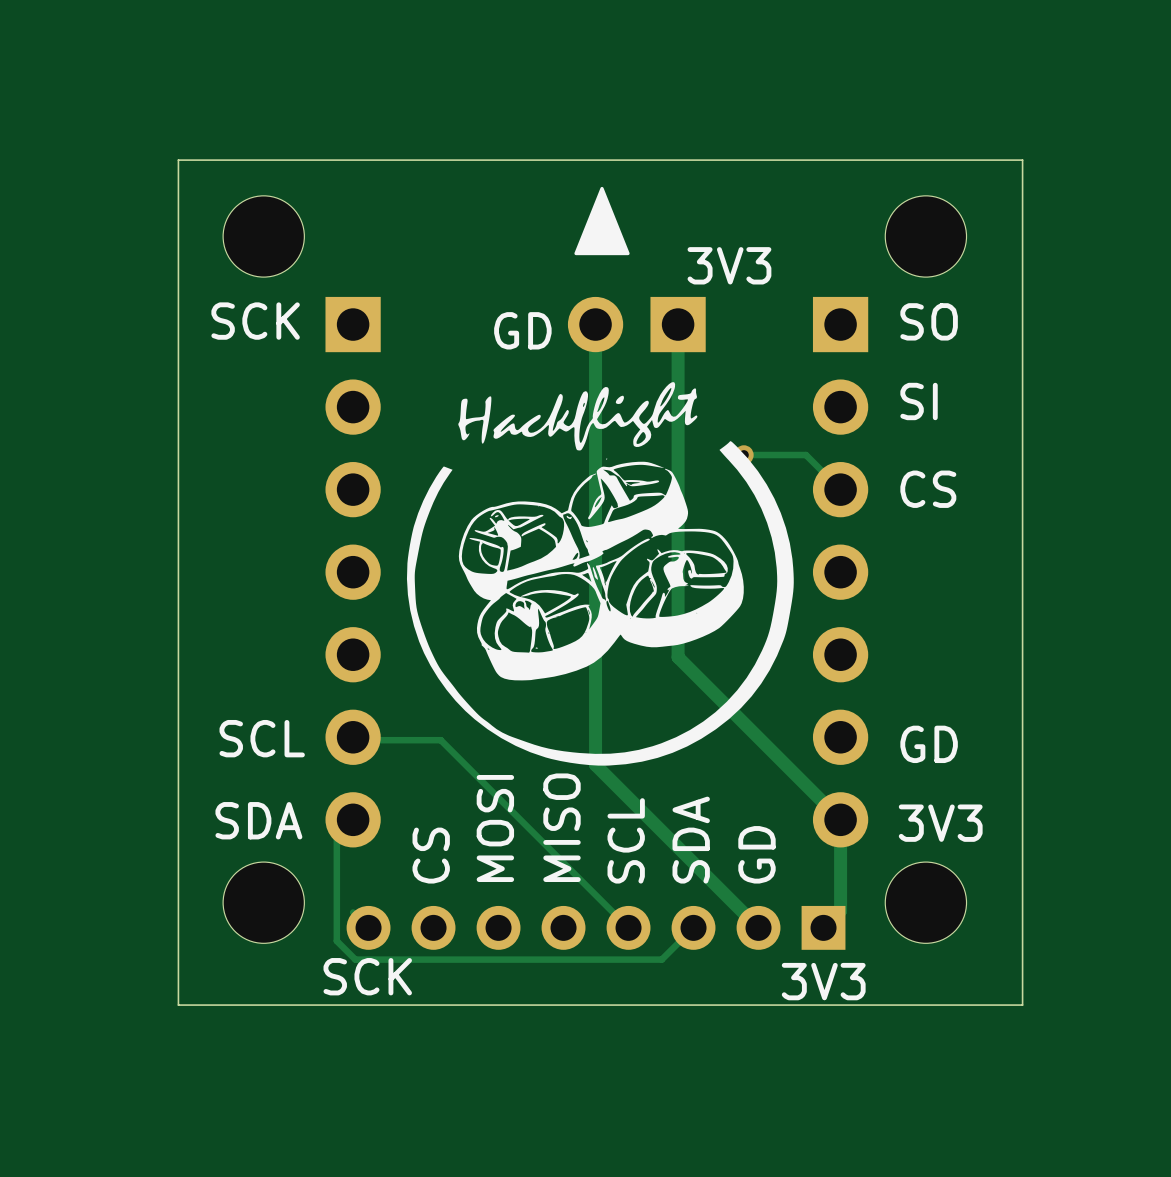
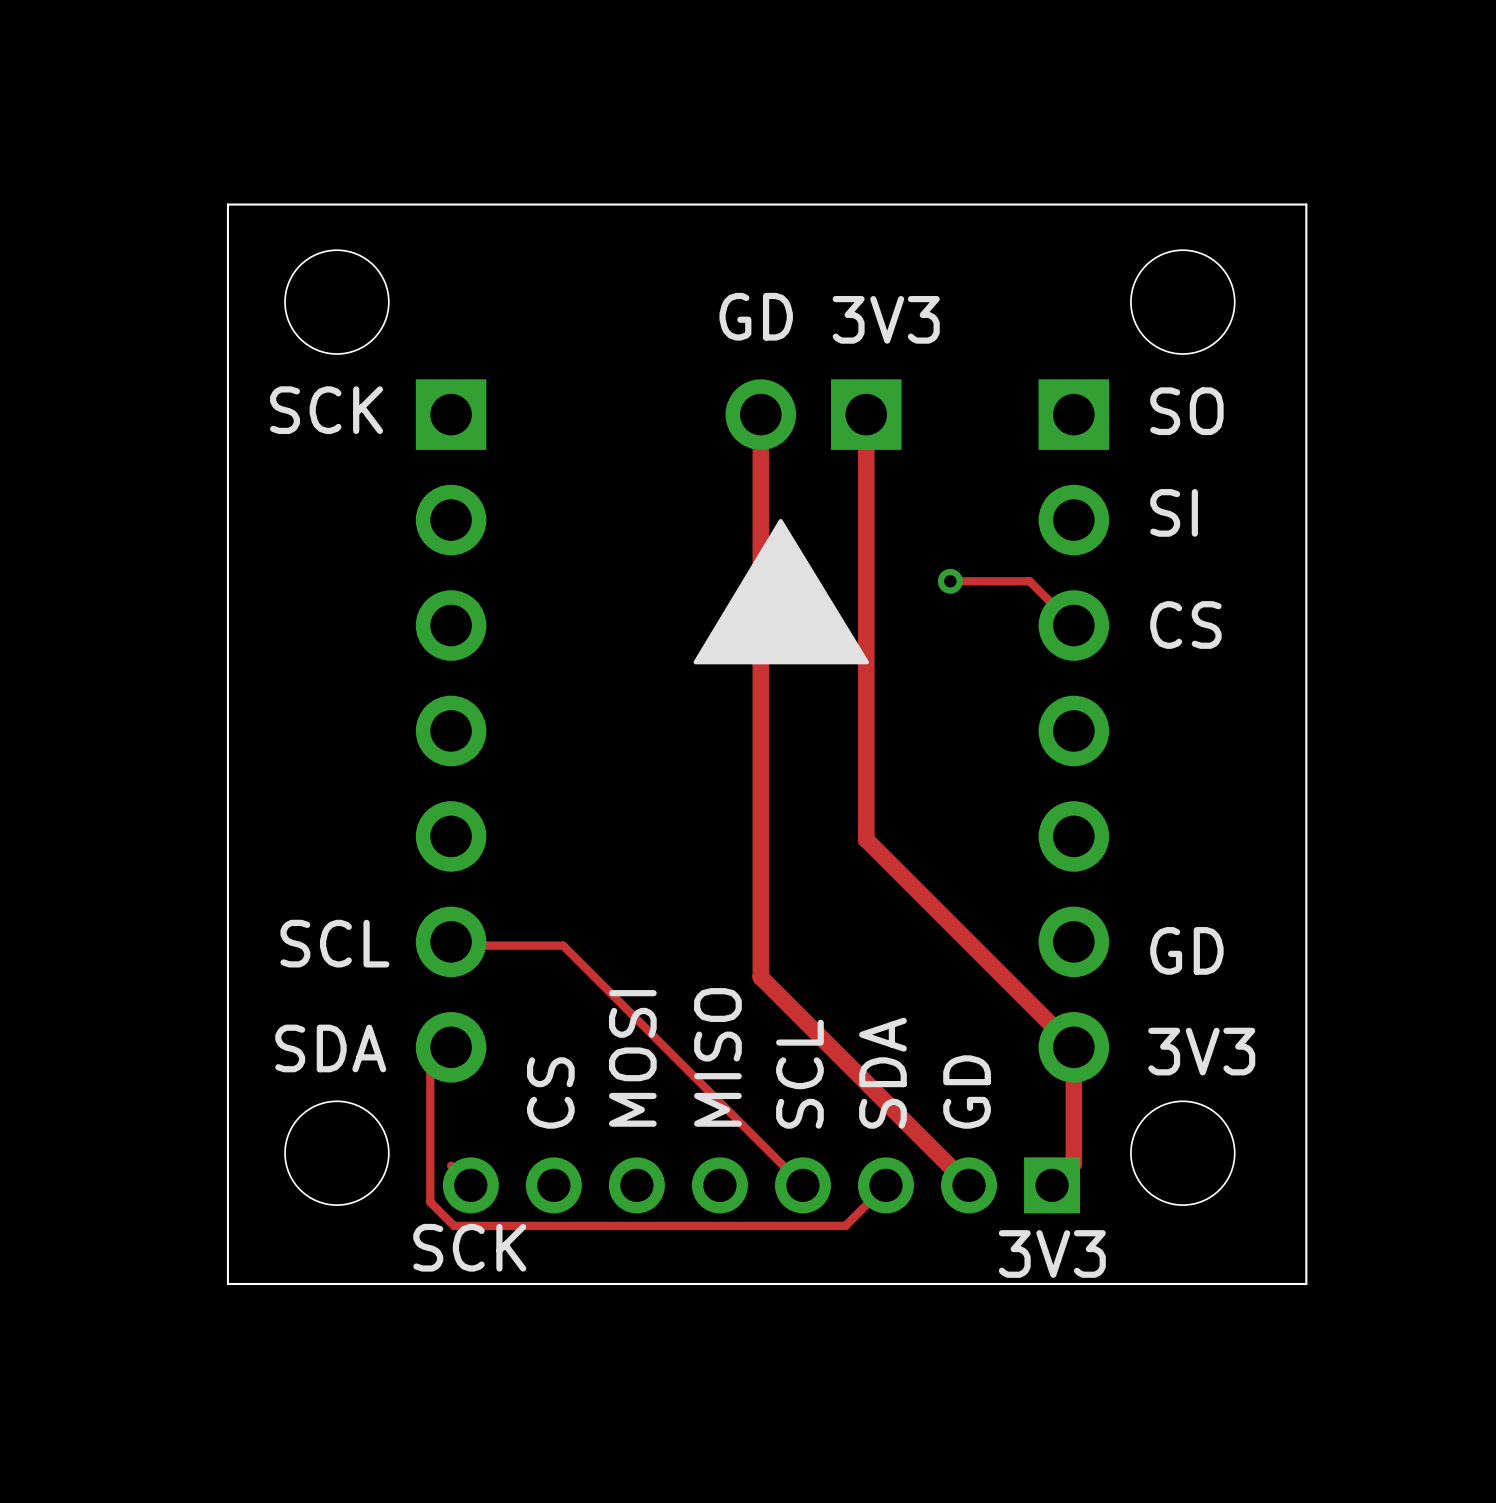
drawing: [574, 186, 630, 256] -> none
text position: 3V3 (729, 265) -> 3V3 (886, 319)
text position: GD (522, 330) -> GD (756, 316)
drawing: [406, 382, 794, 766] -> none
drawing: none -> [693, 519, 869, 665]

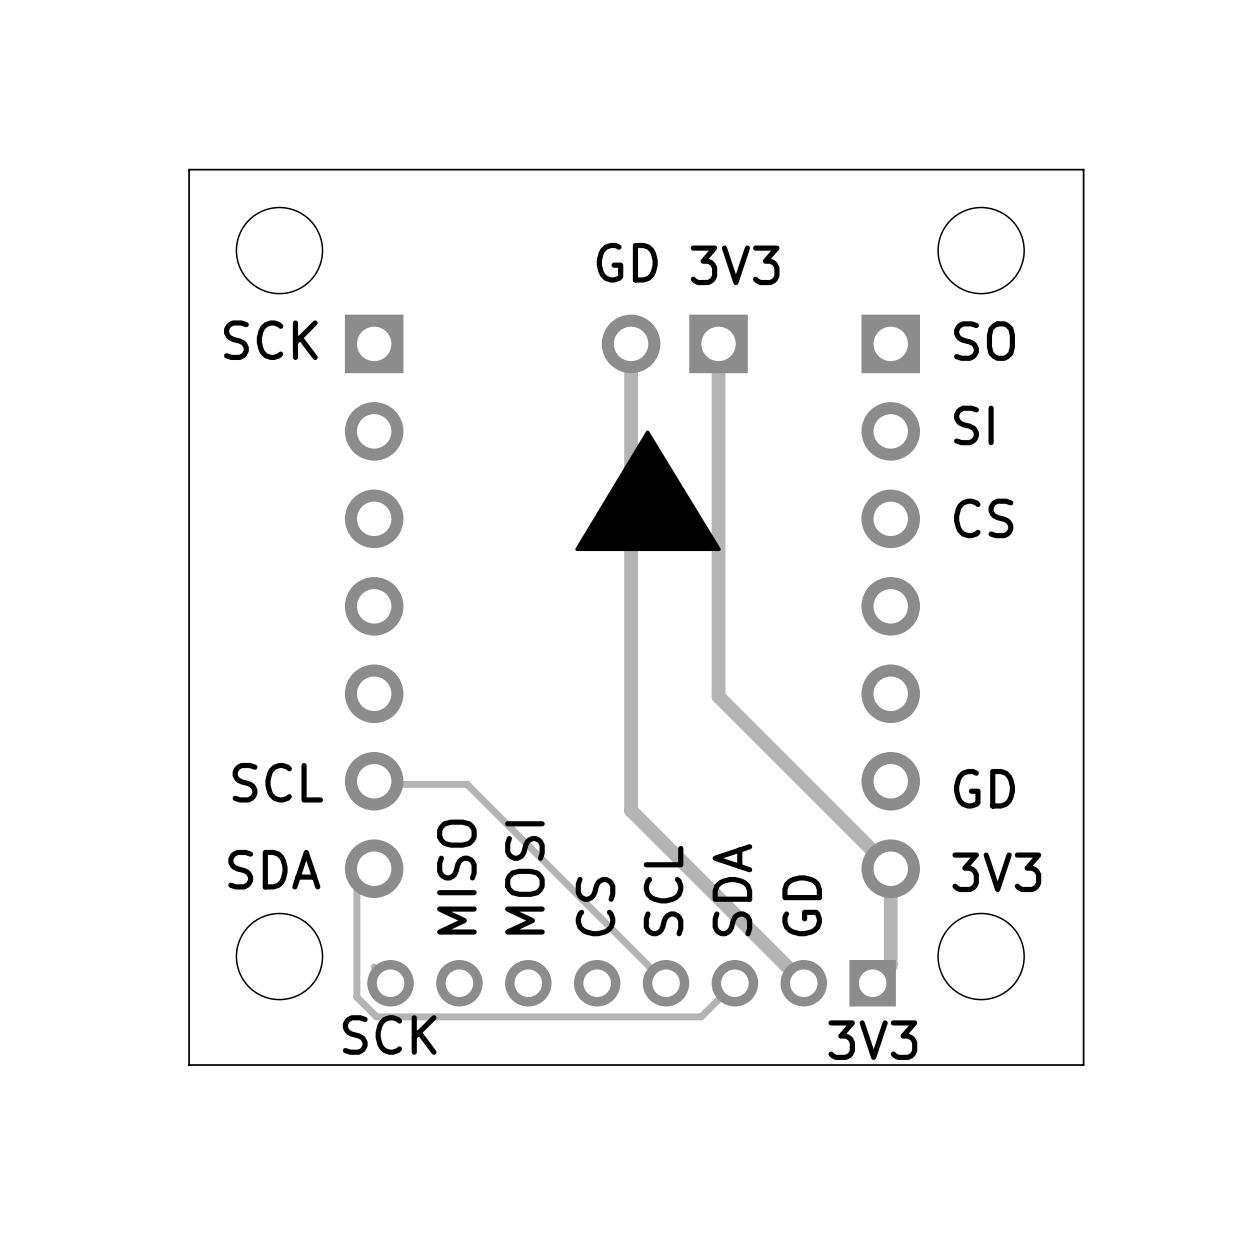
track: (950, 581) (1029, 581) (1073, 625) -> none
via: (950, 581) -> none
text: MISO (717, 1057) -> CS (595, 906)
text: CS (550, 1093) -> MISO (456, 877)

